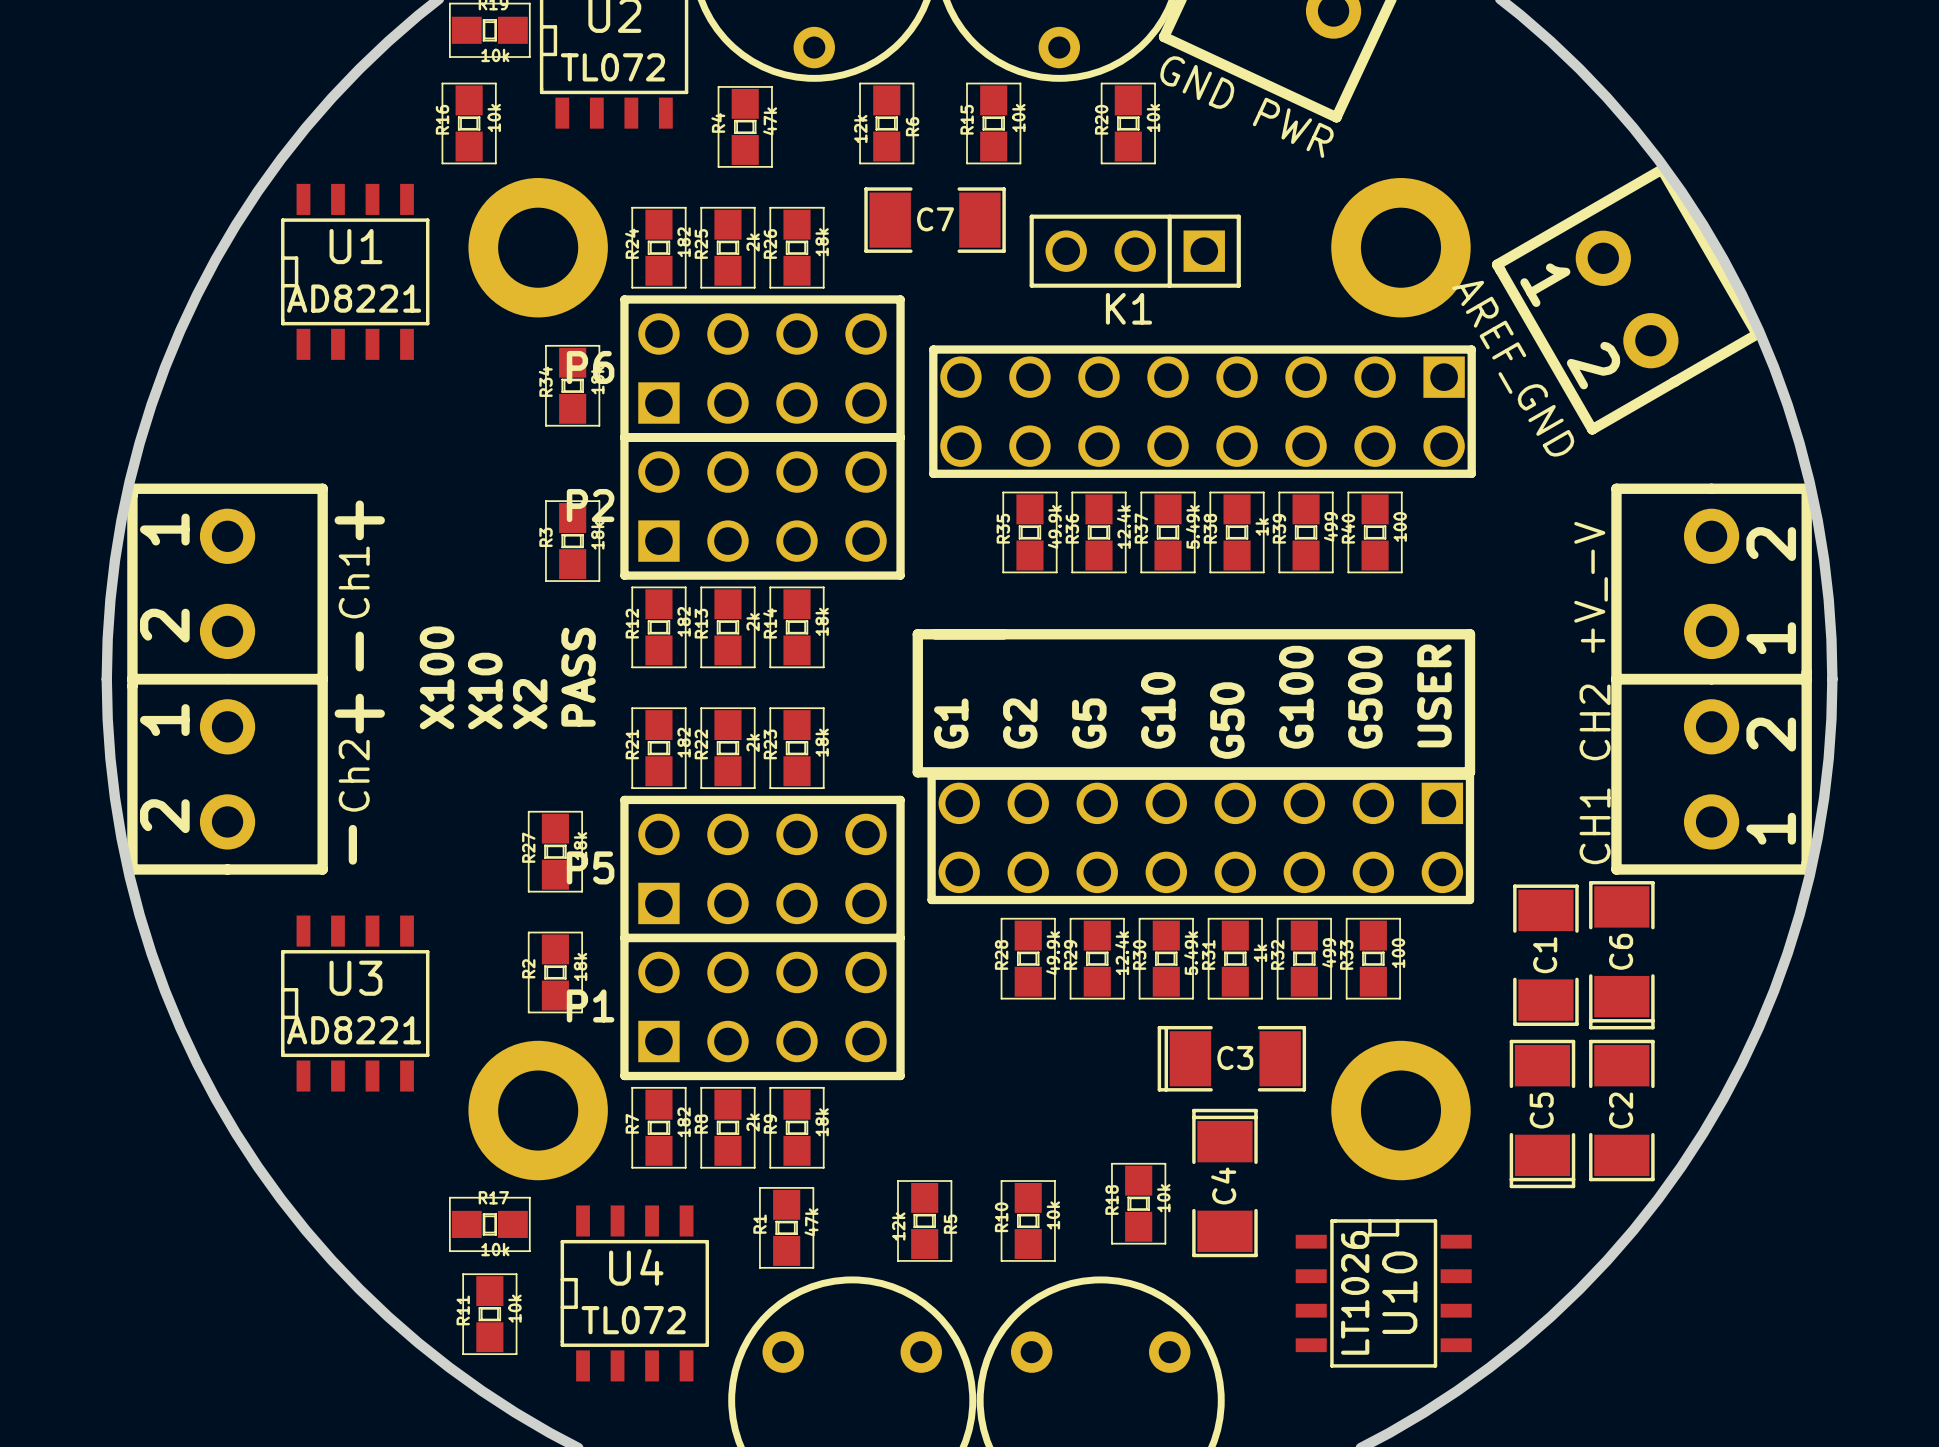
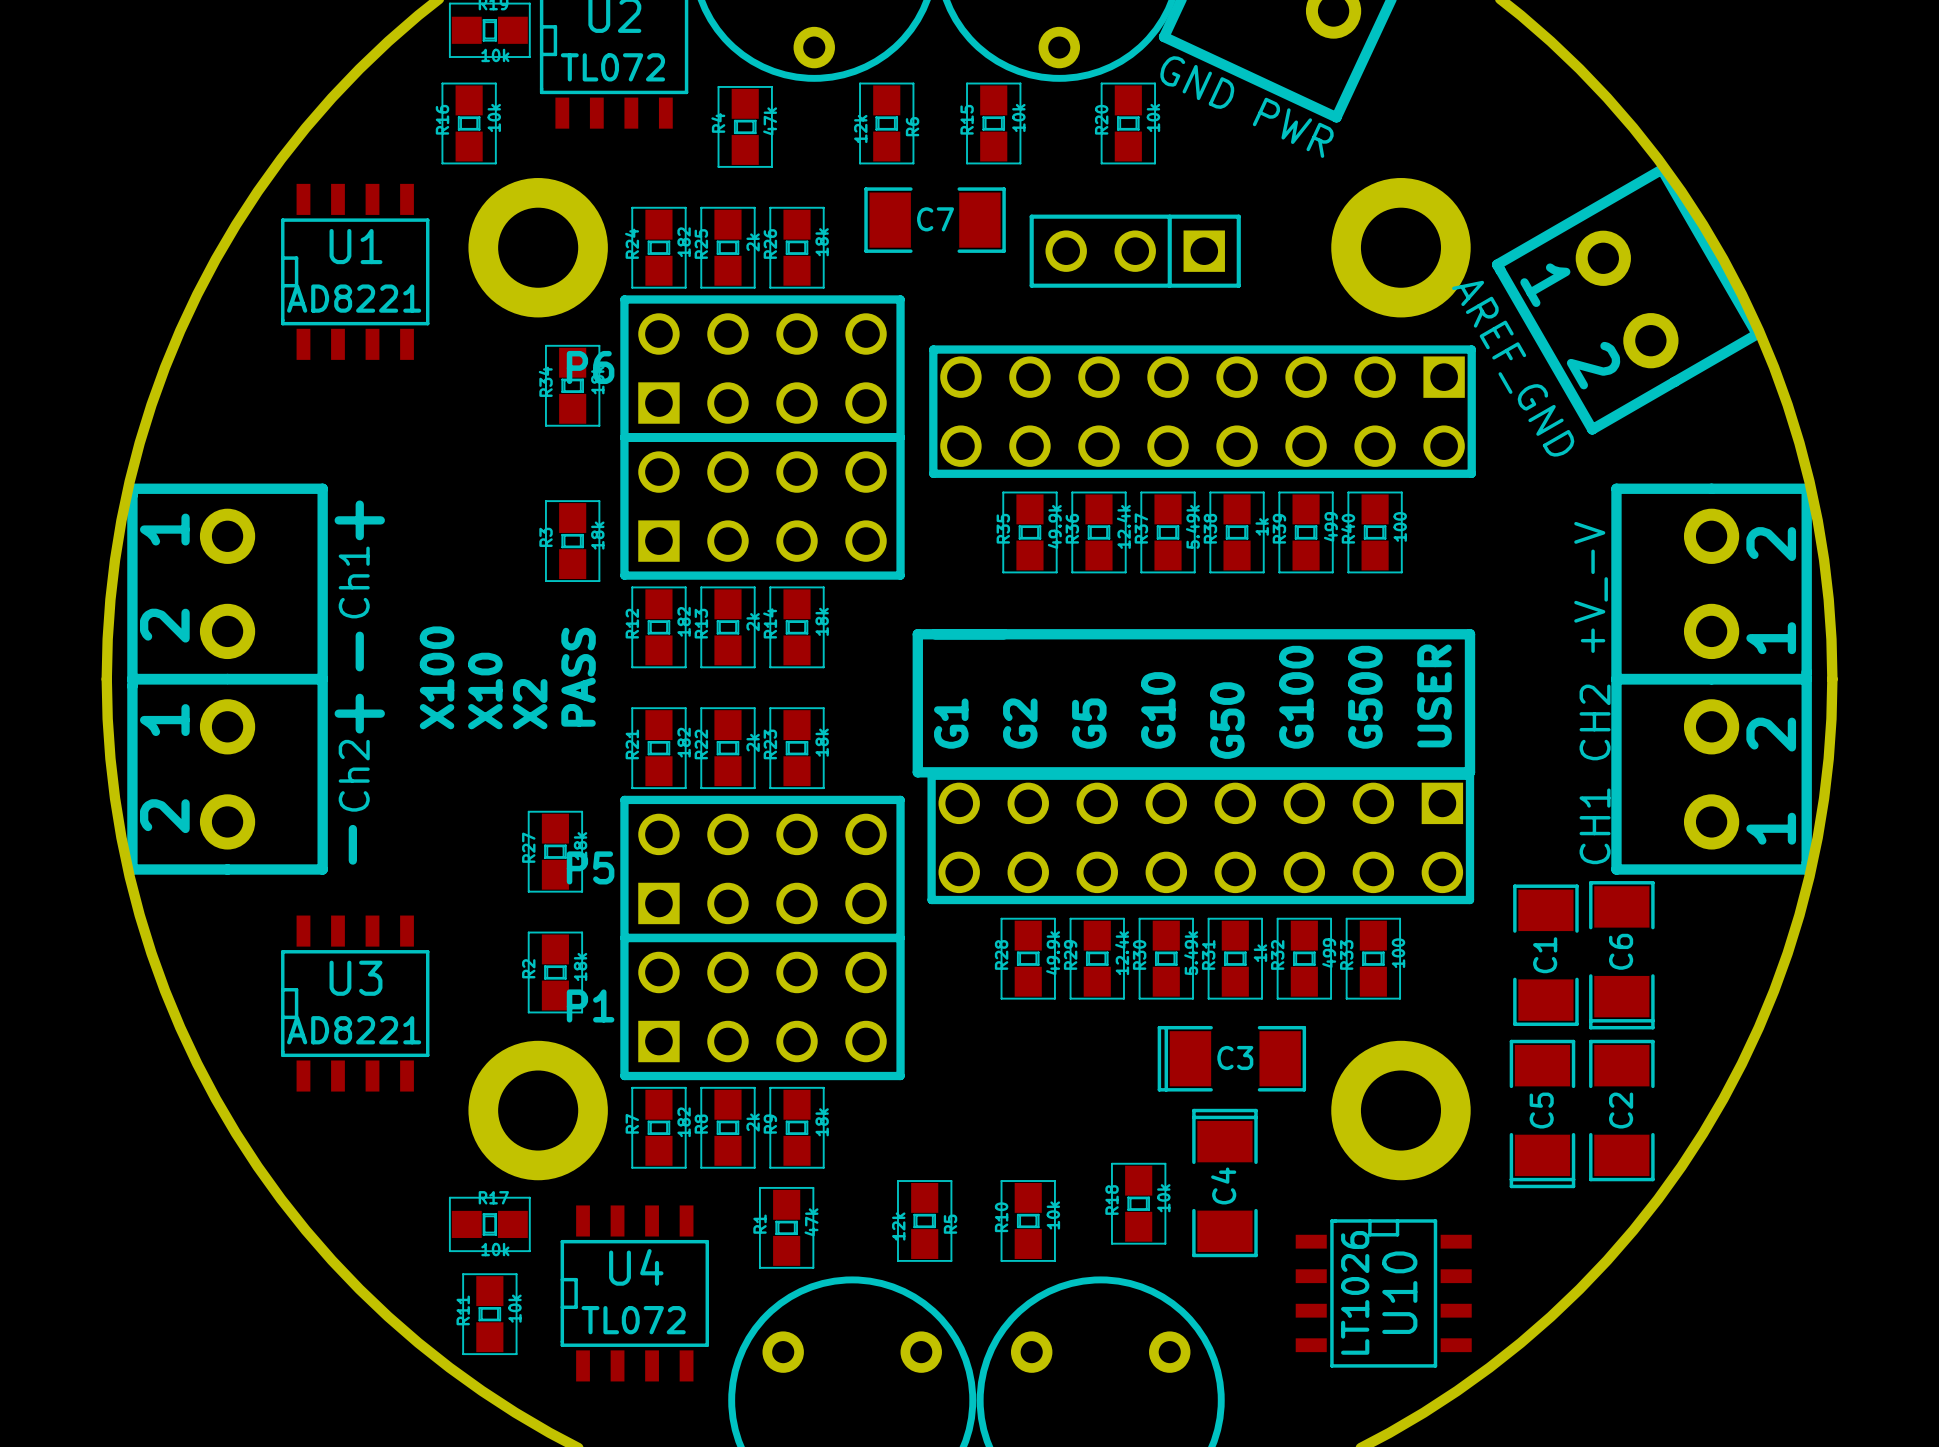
K1 name: K1 (1128, 308) -> none
P2 name: P2 (590, 505) -> none

